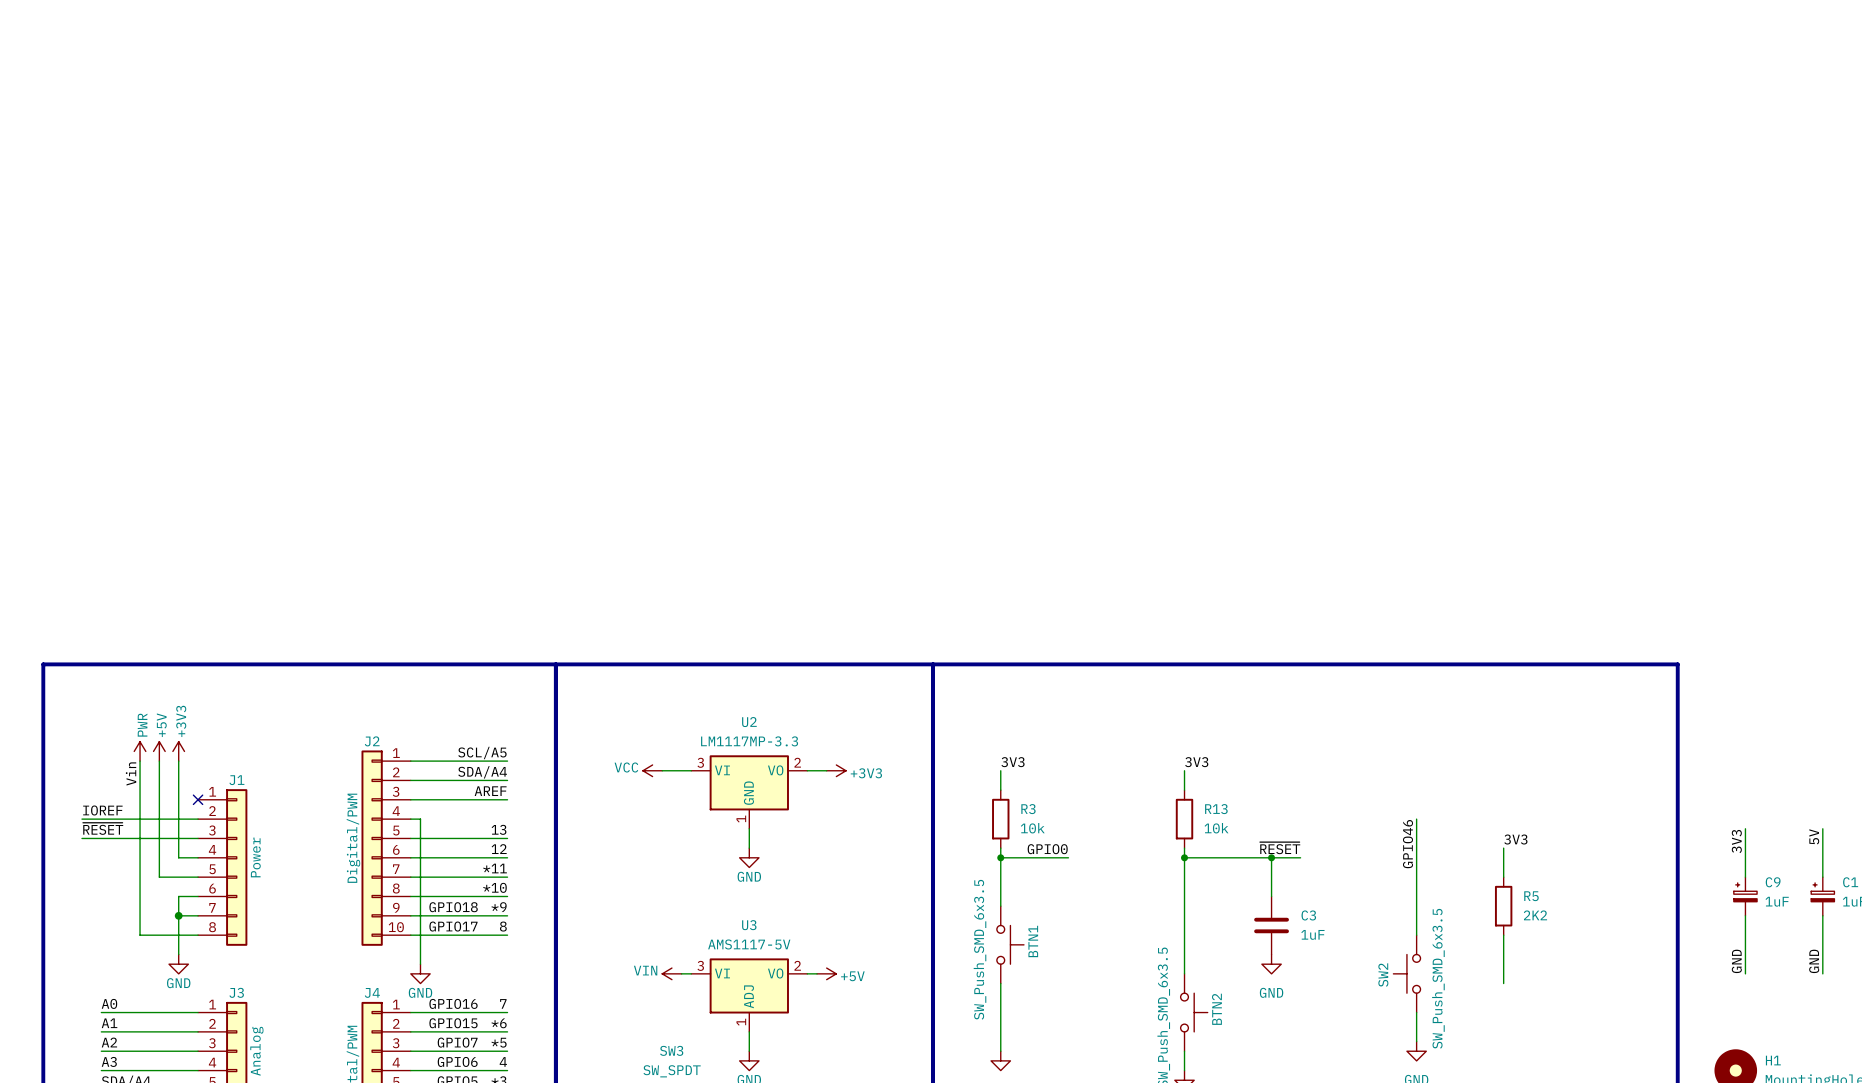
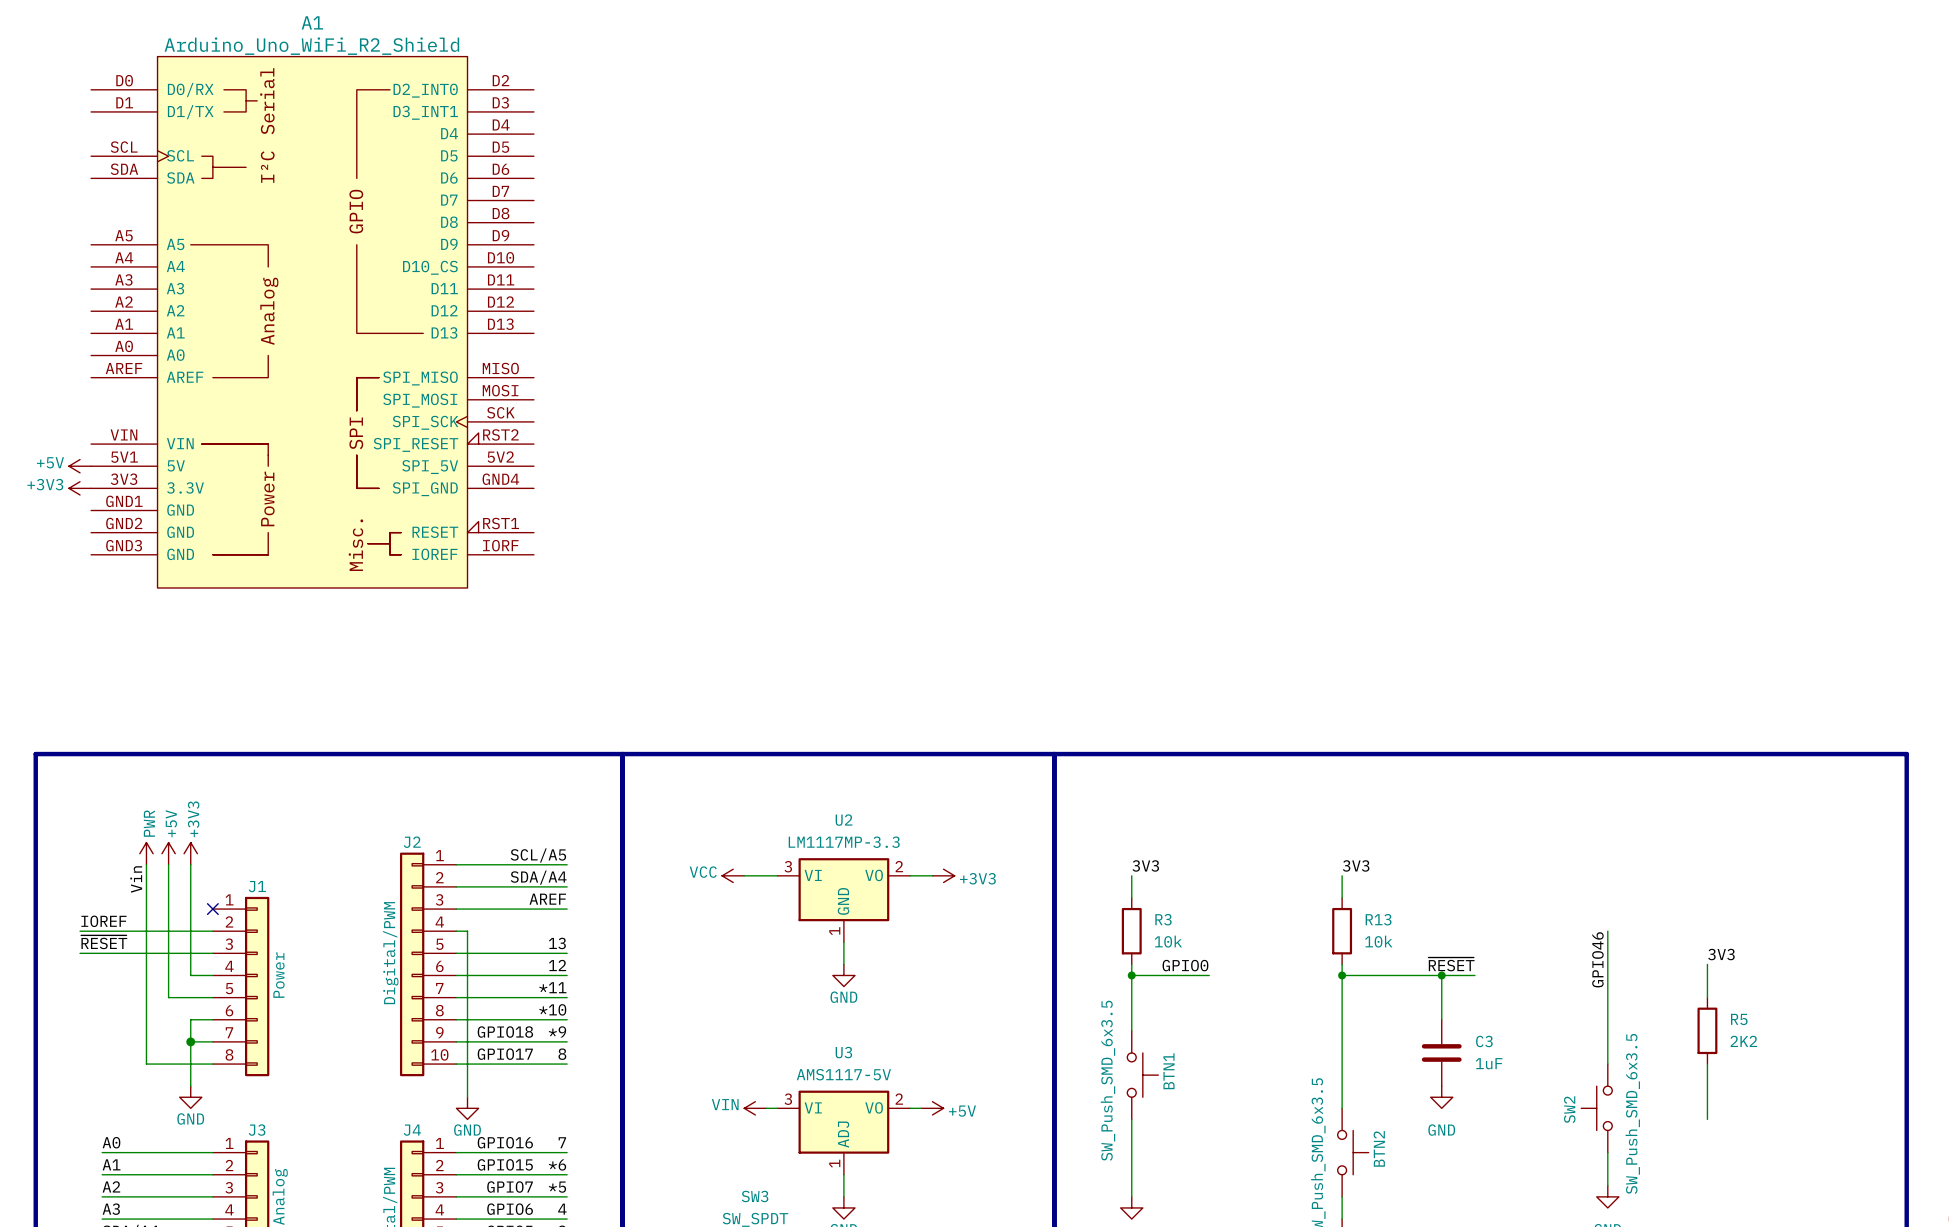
A1: none -> Arduino_Uno_WiFi_R2_Shield (312, 322)
power symbol: none -> +5V (80, 466)
power symbol: none -> +3V3 (80, 488)

